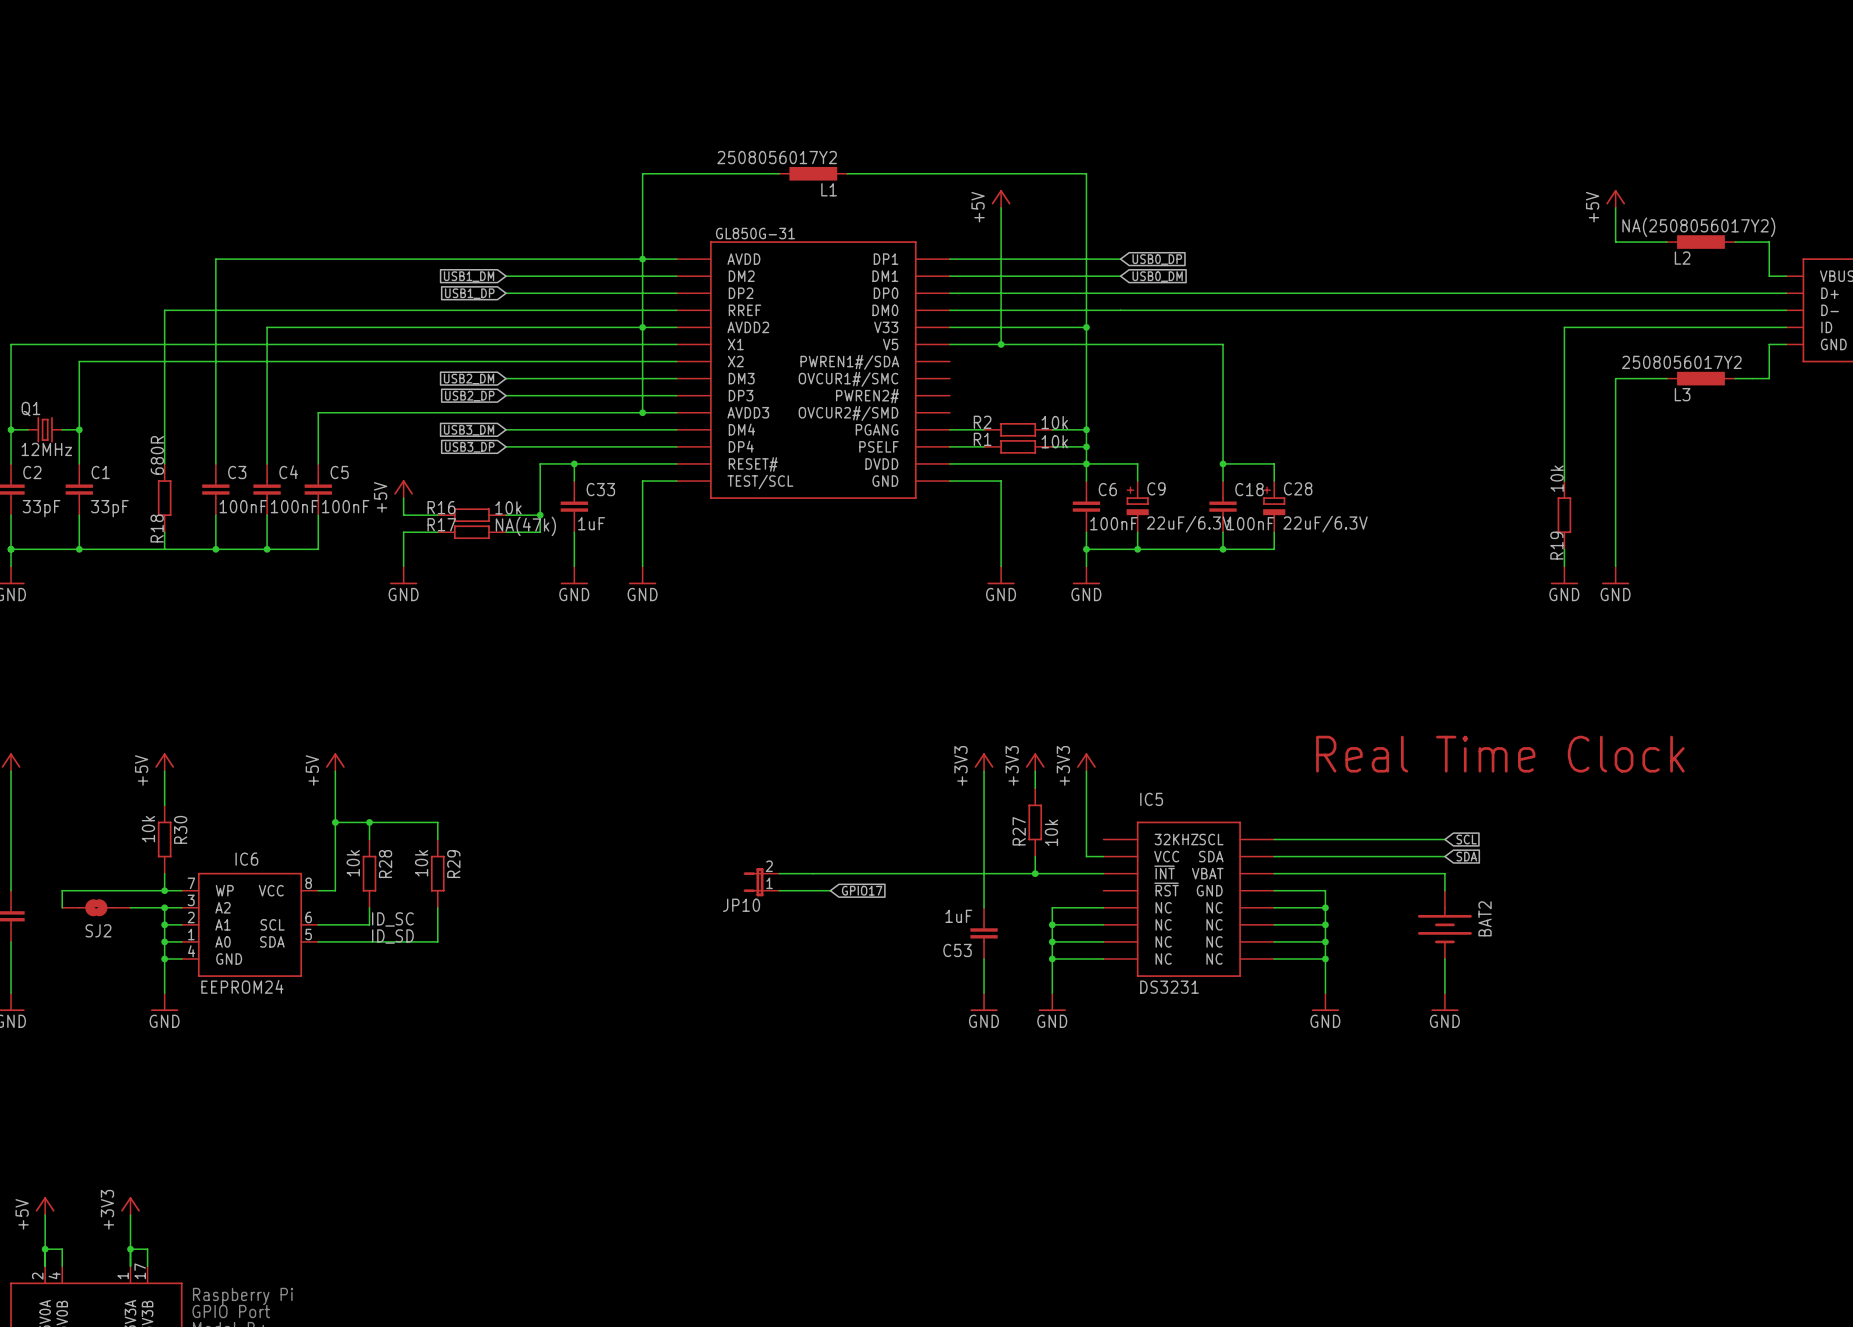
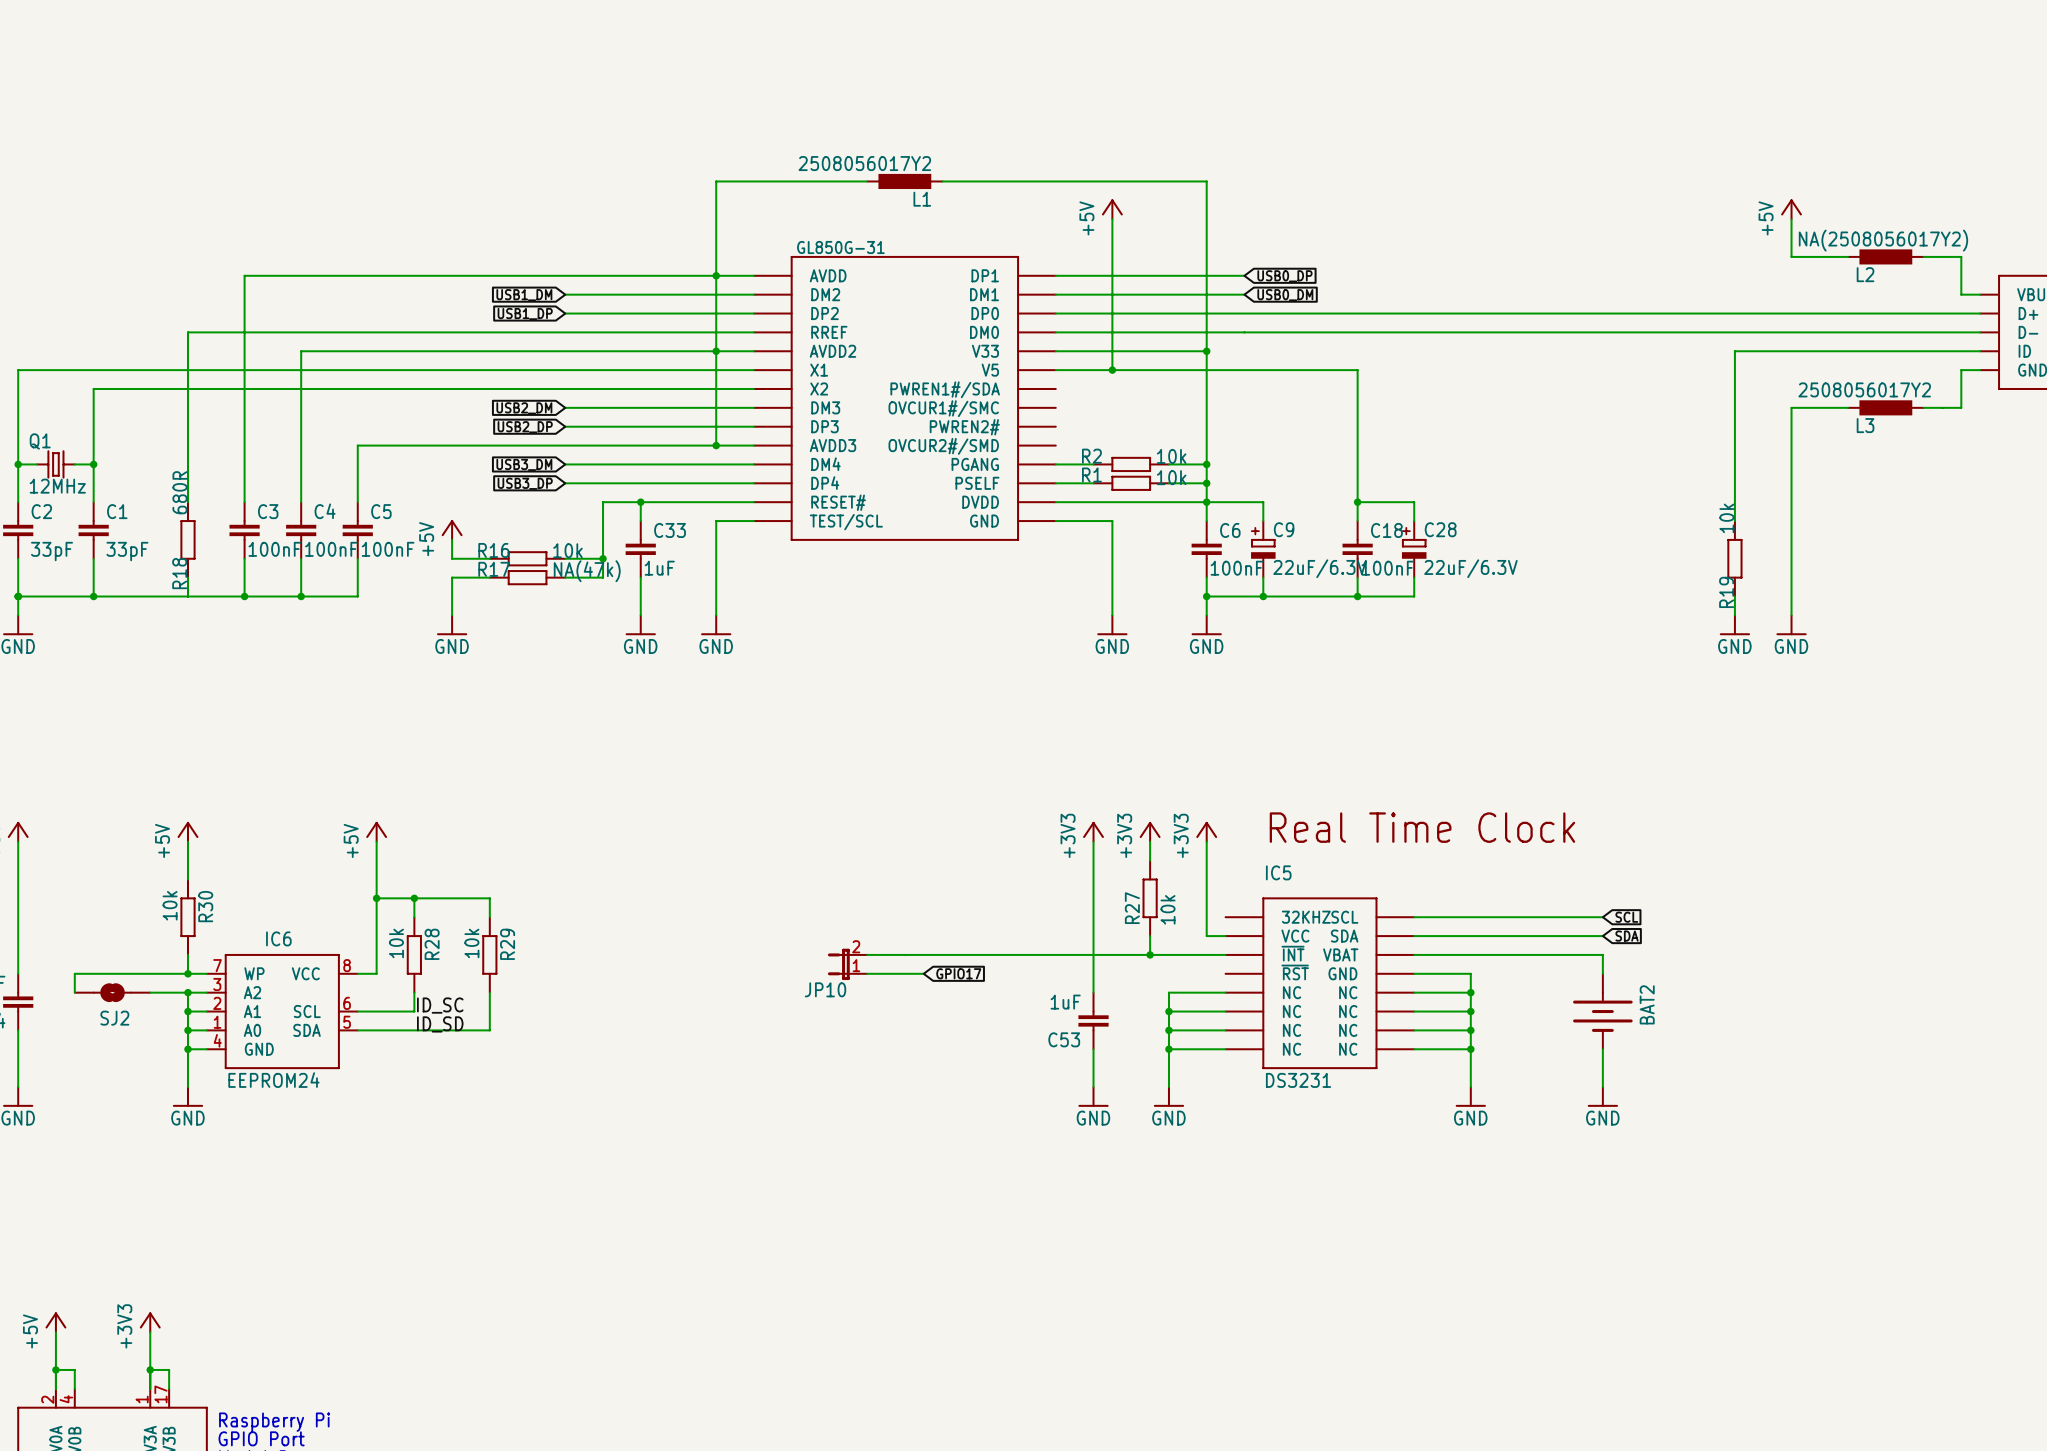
text: Real Time Clock (1500, 754) -> none
text: none -> Real Time Clock (1422, 827)

